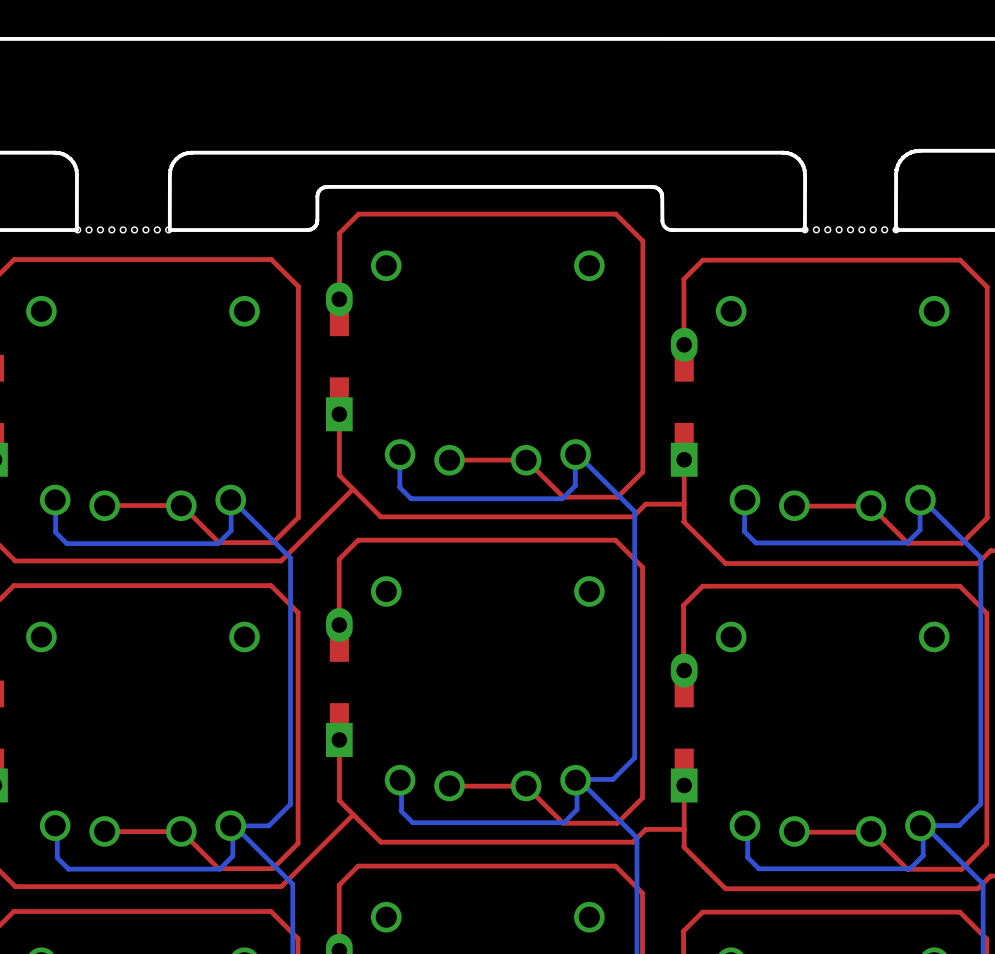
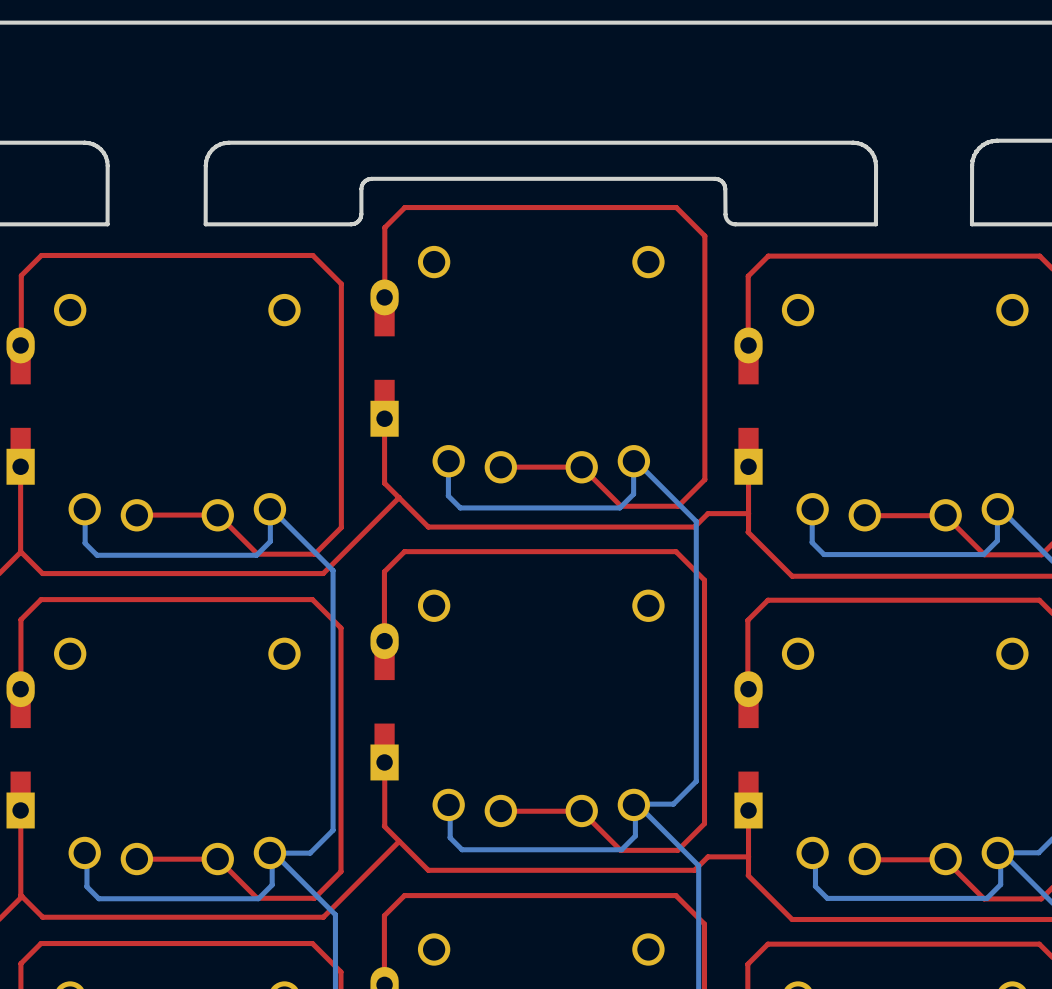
part: (123, 229) -> none
part: (850, 229) -> none

